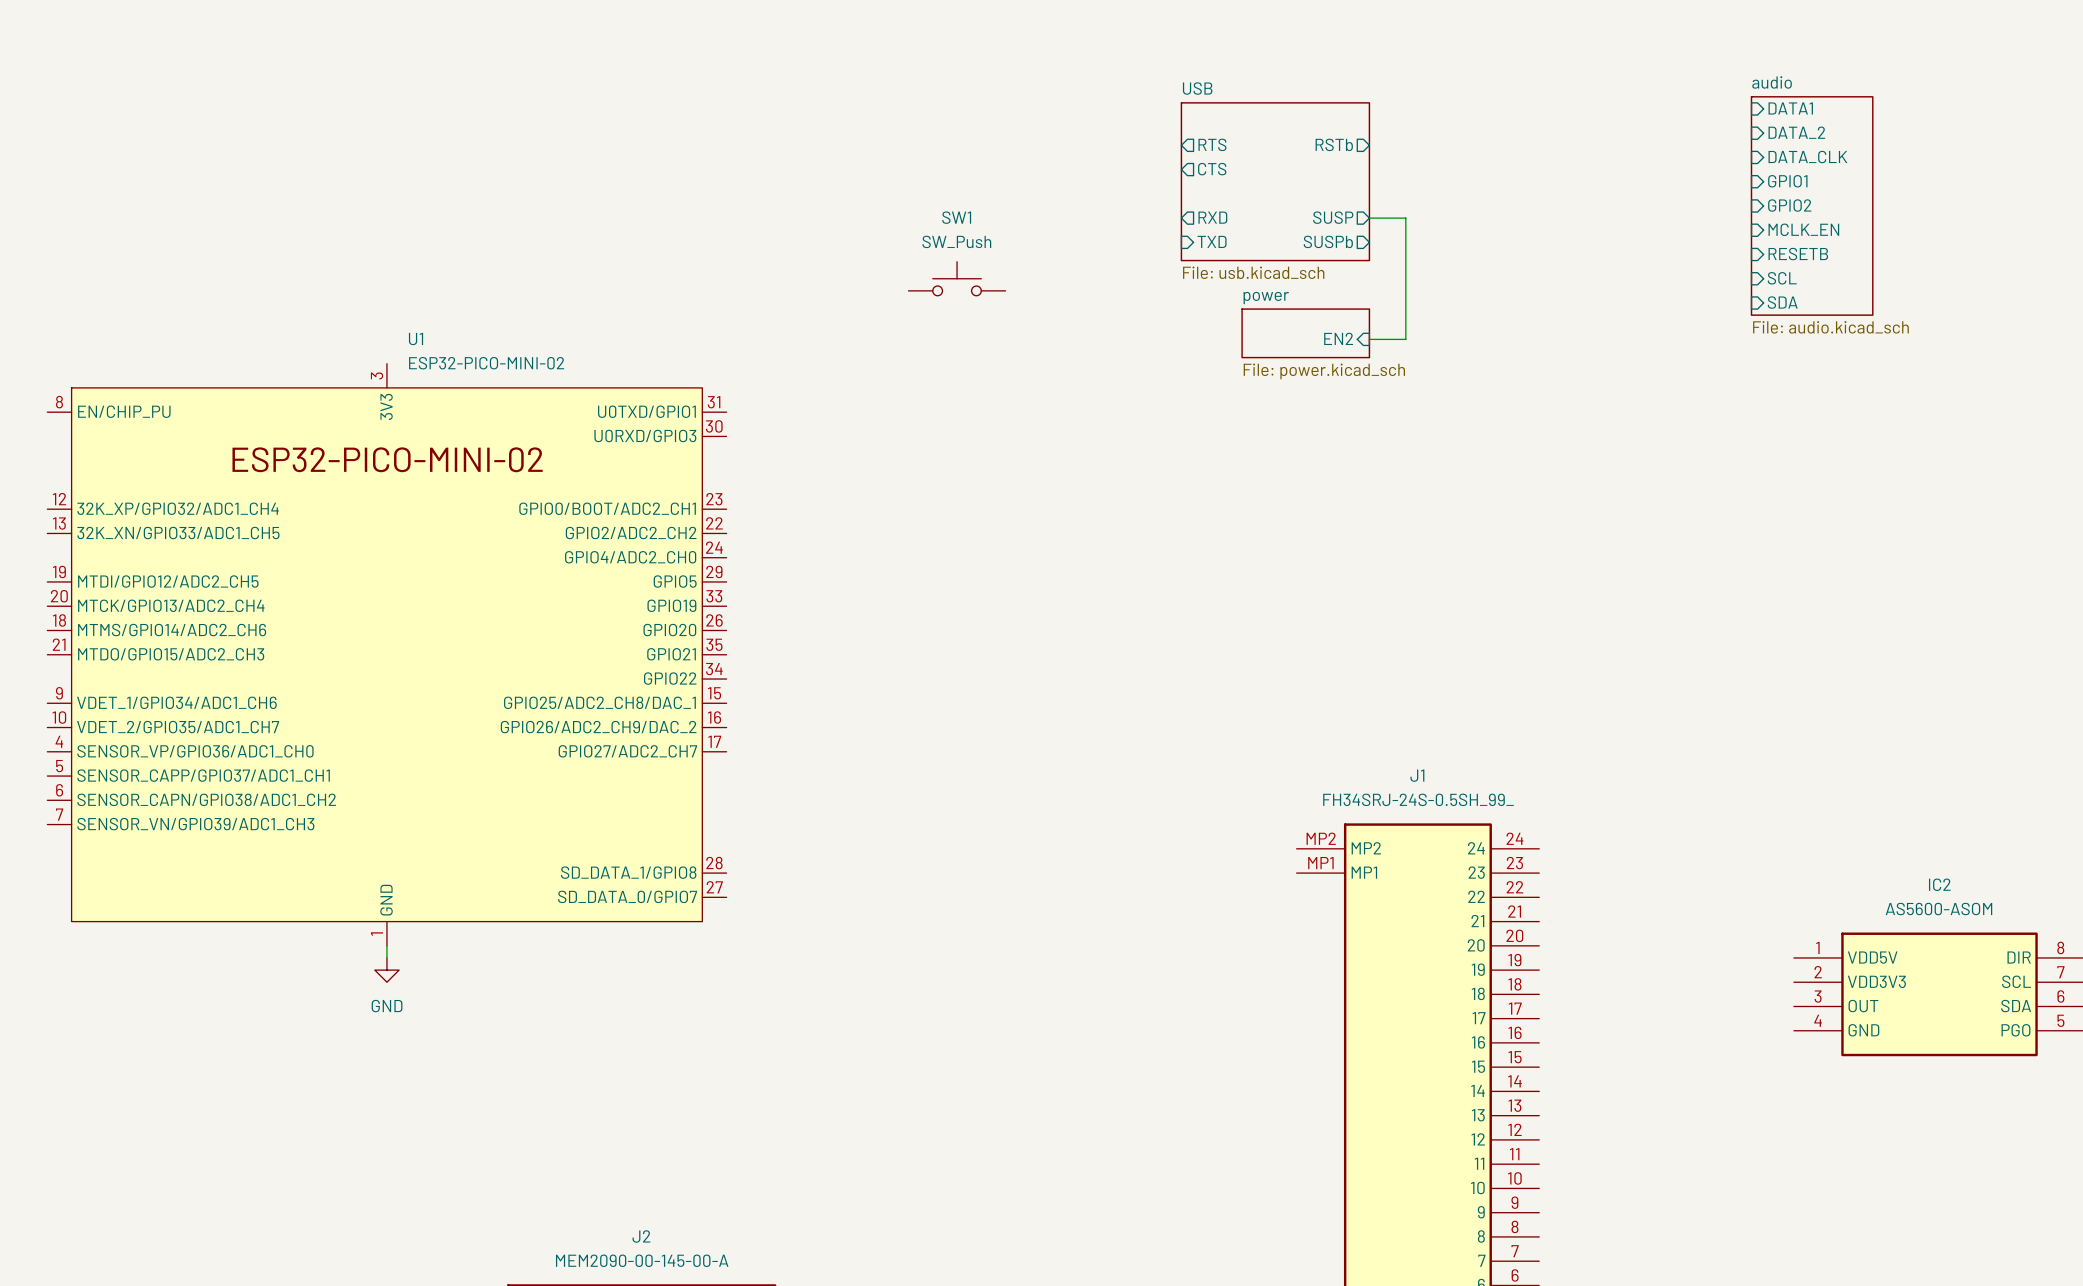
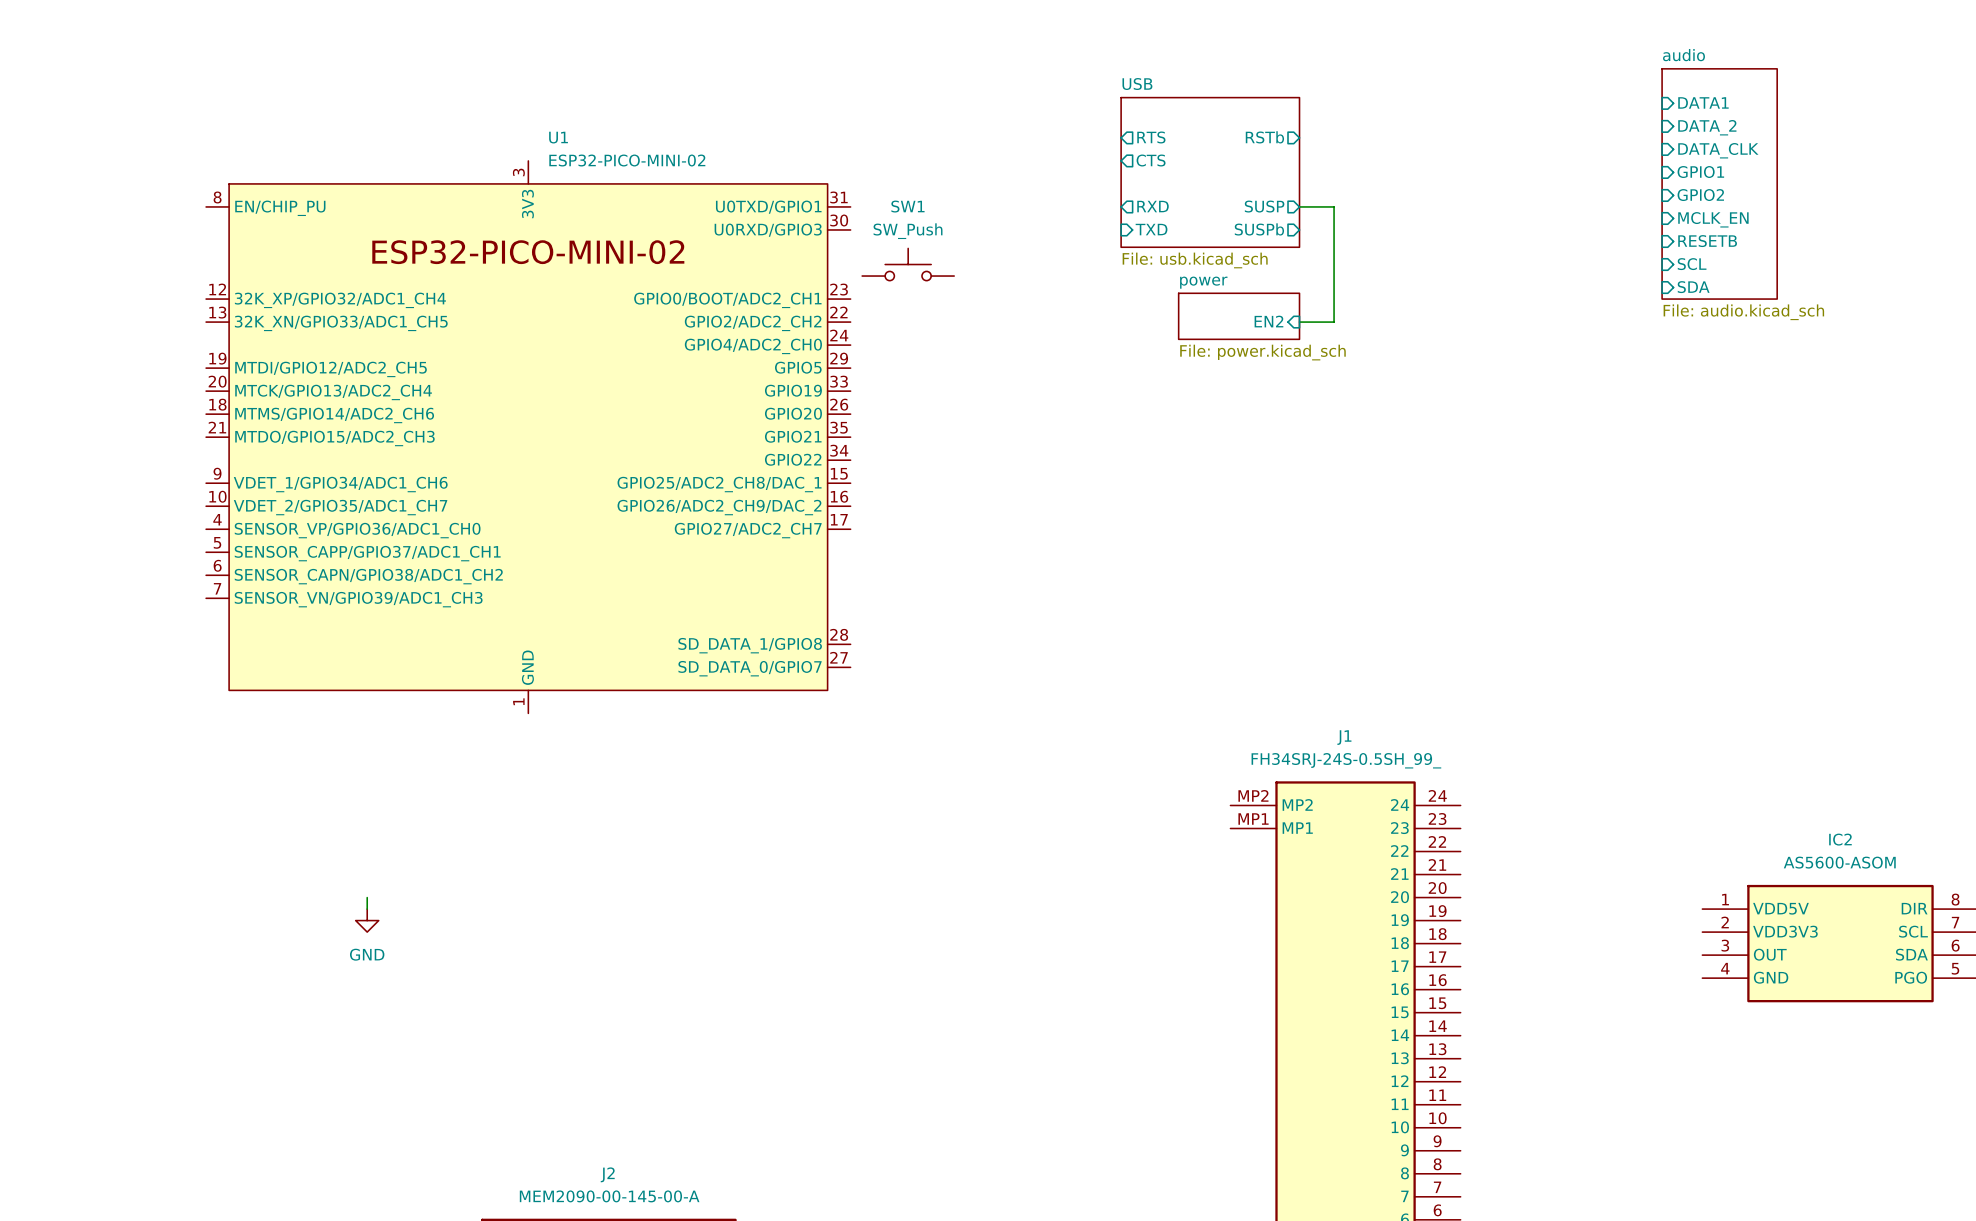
sheet audio: none -> File: audio.kicad_sch (1719, 183)
sheet audio: File: audio.kicad_sch (1812, 205) -> none
U1 position: (386, 654) -> (528, 437)

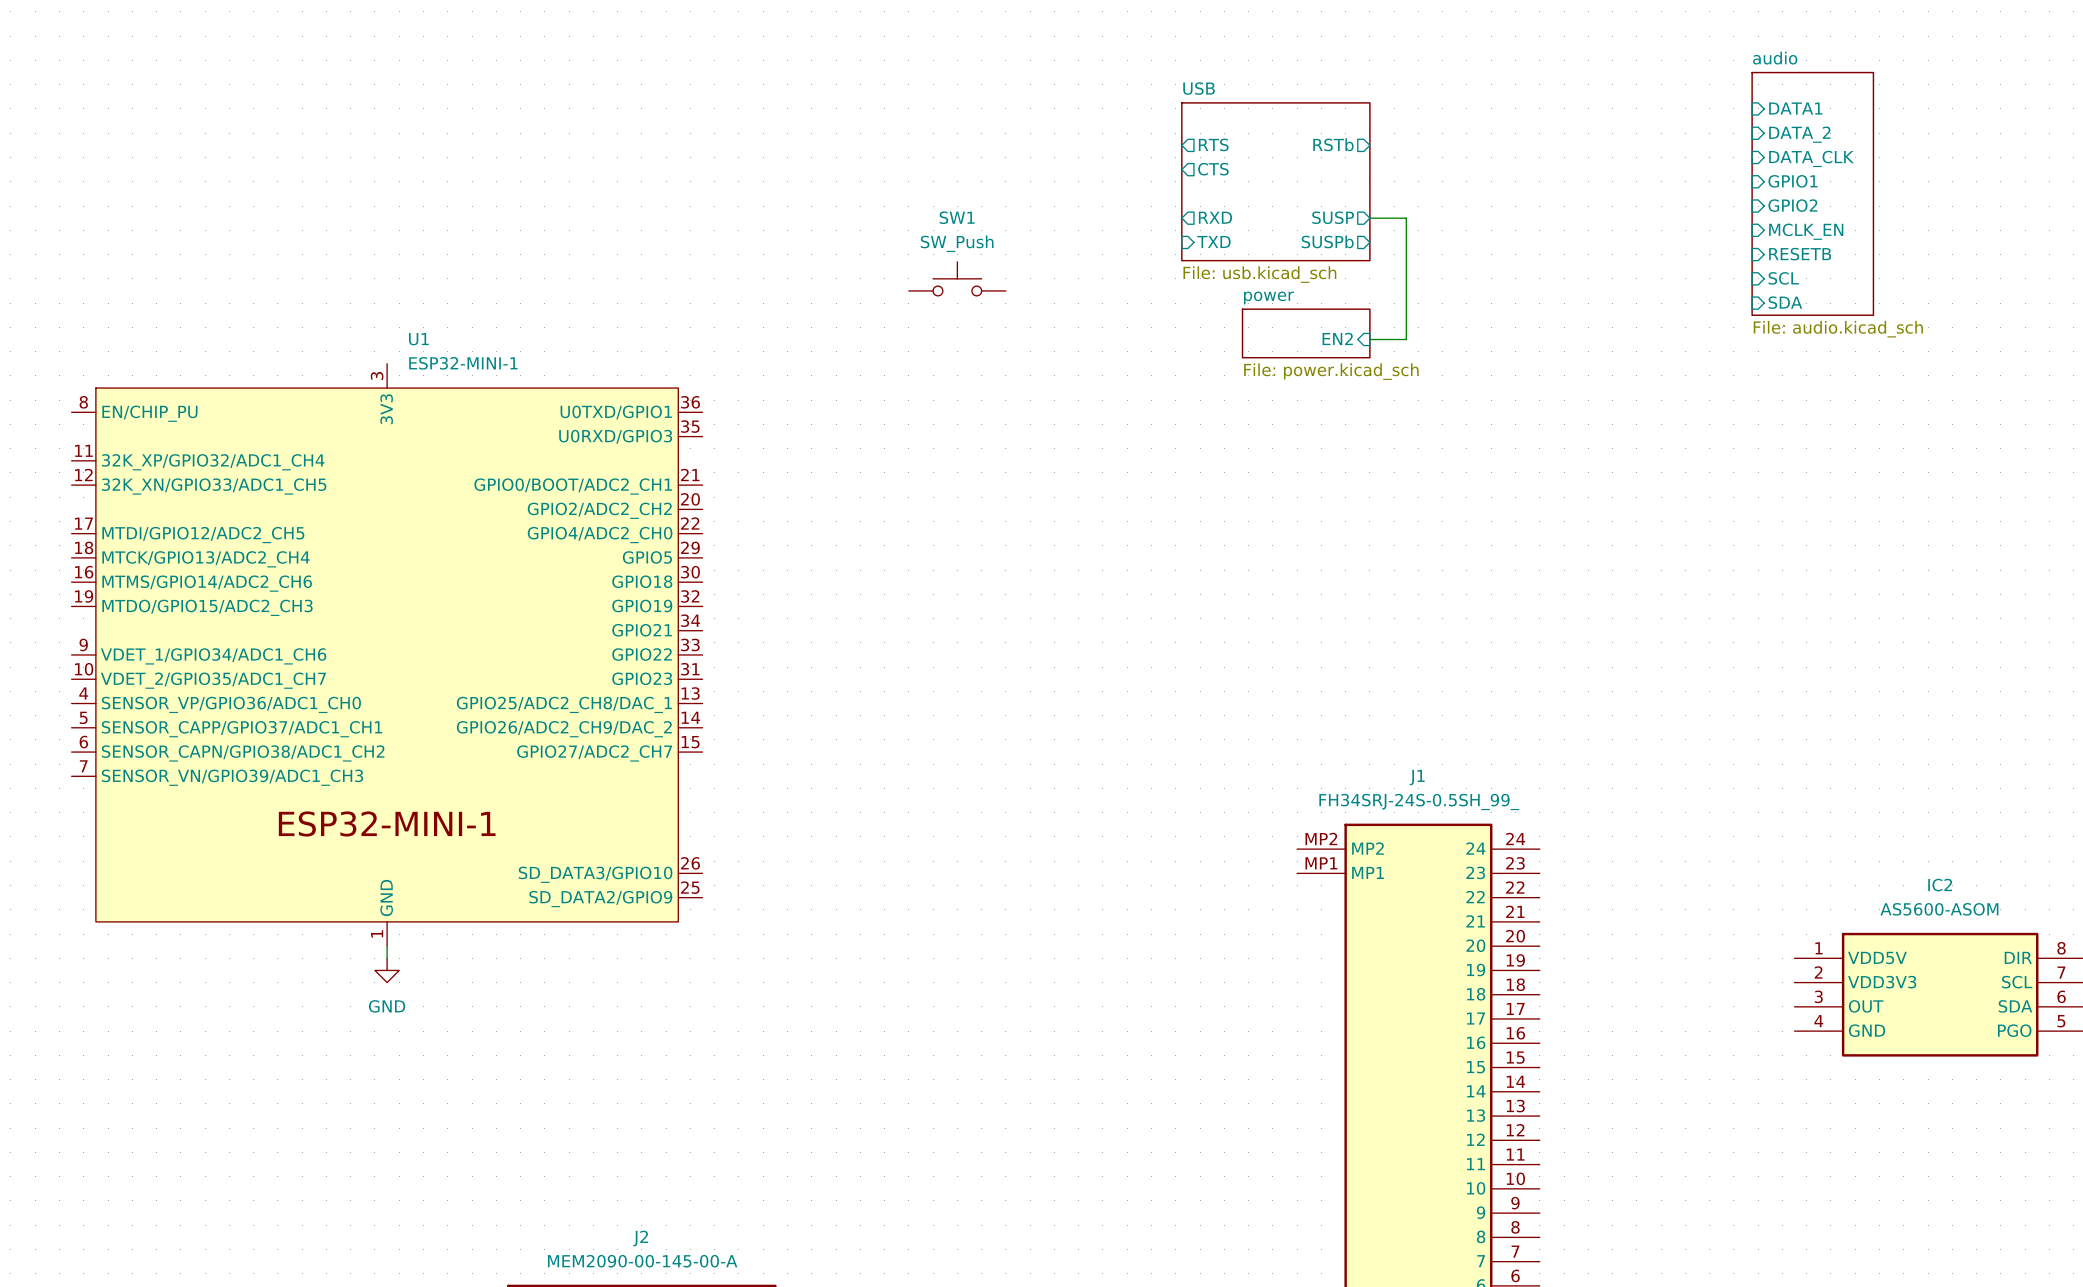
U1 symbol: [206, 160, 851, 714] -> [71, 363, 703, 947]
U1 value: ESP32-PICO-MINI-02 (627, 160) -> ESP32-MINI-1 (463, 363)

